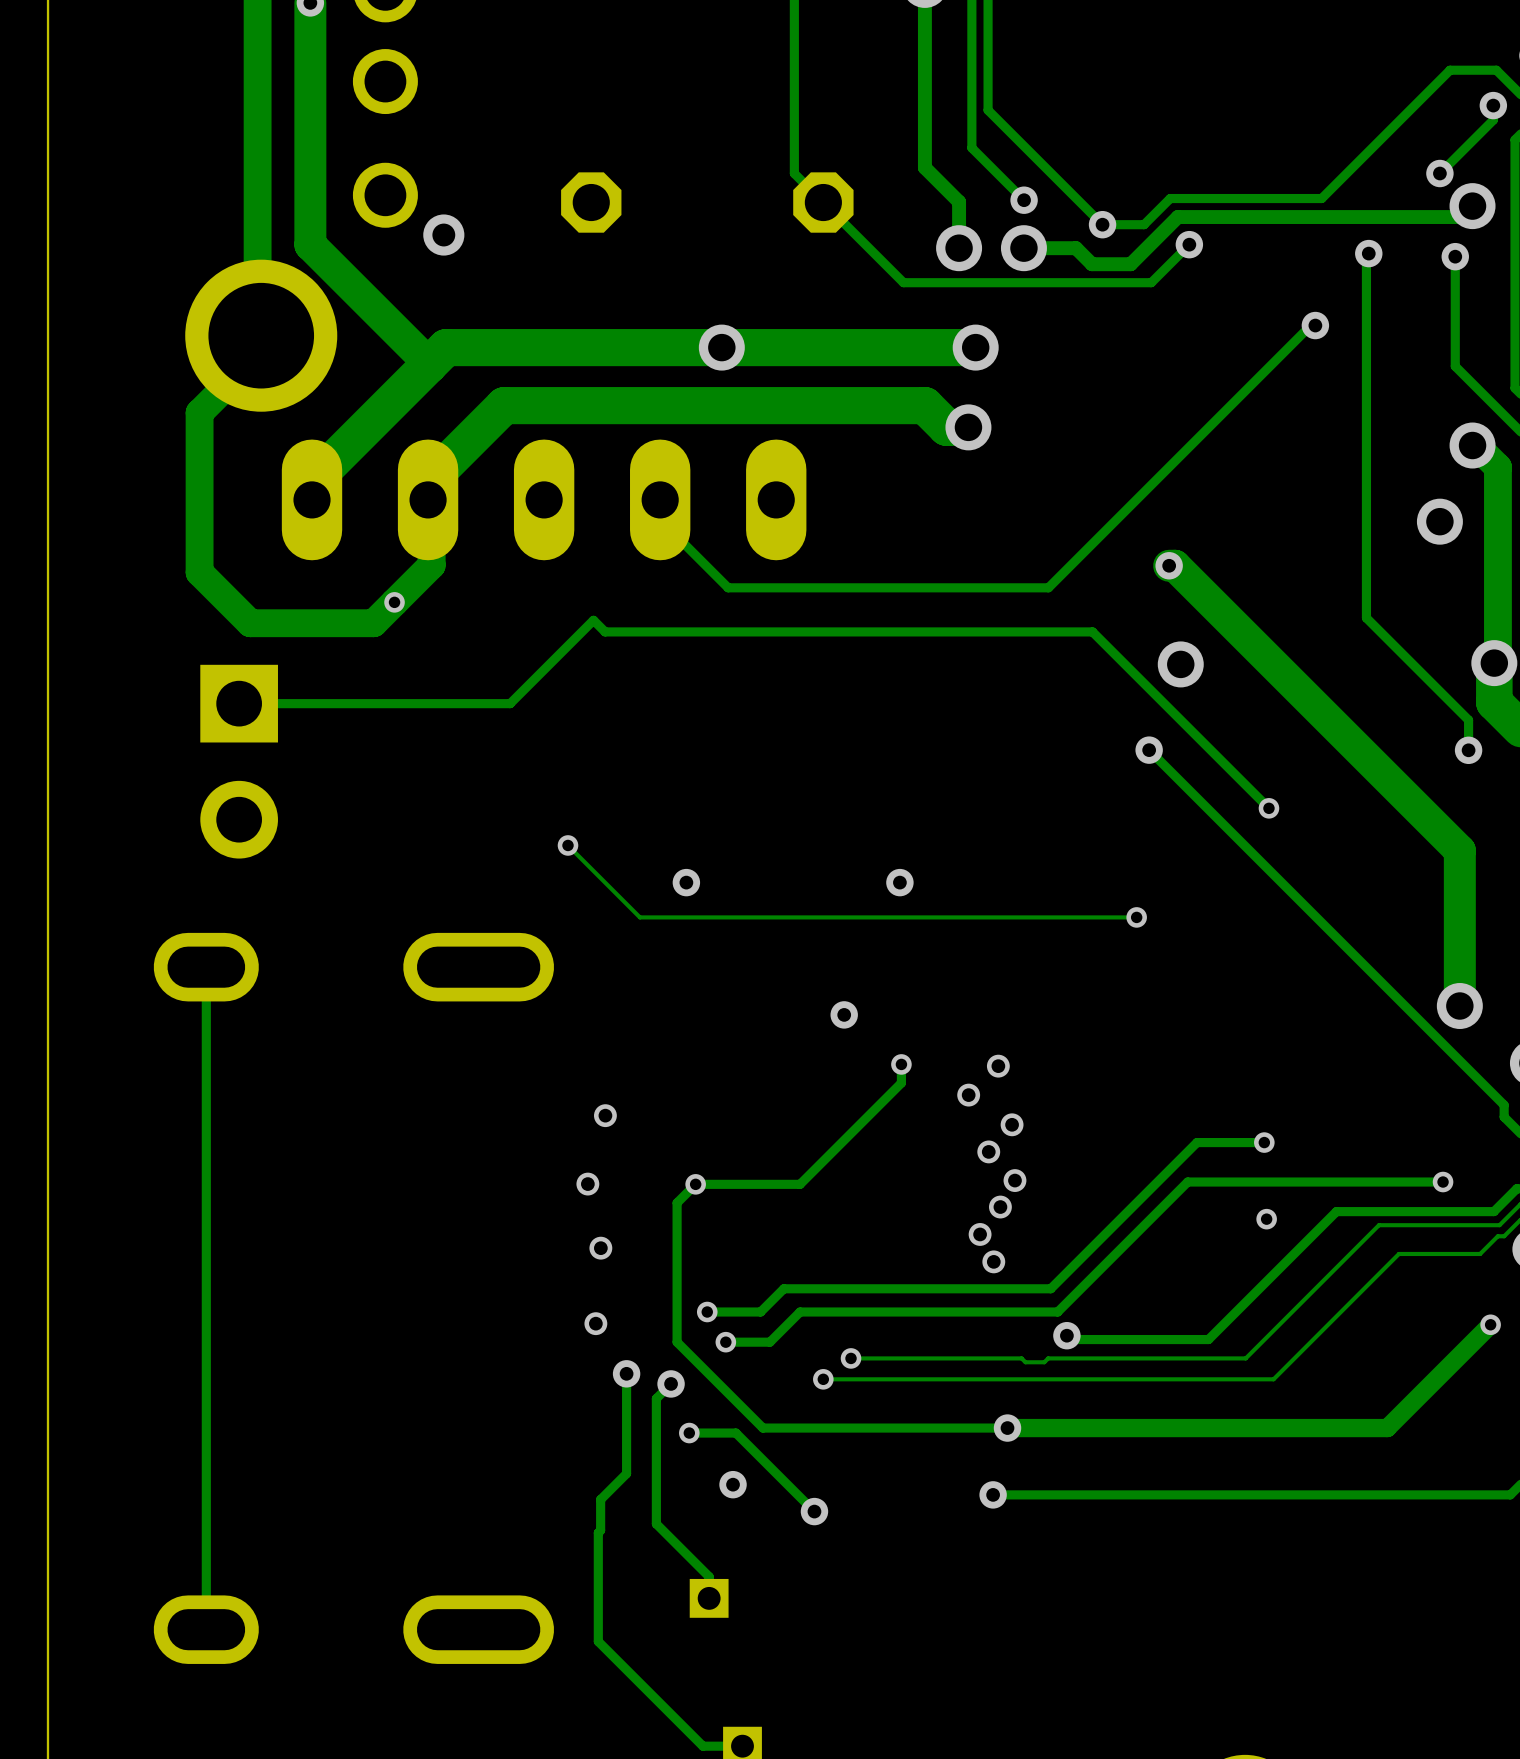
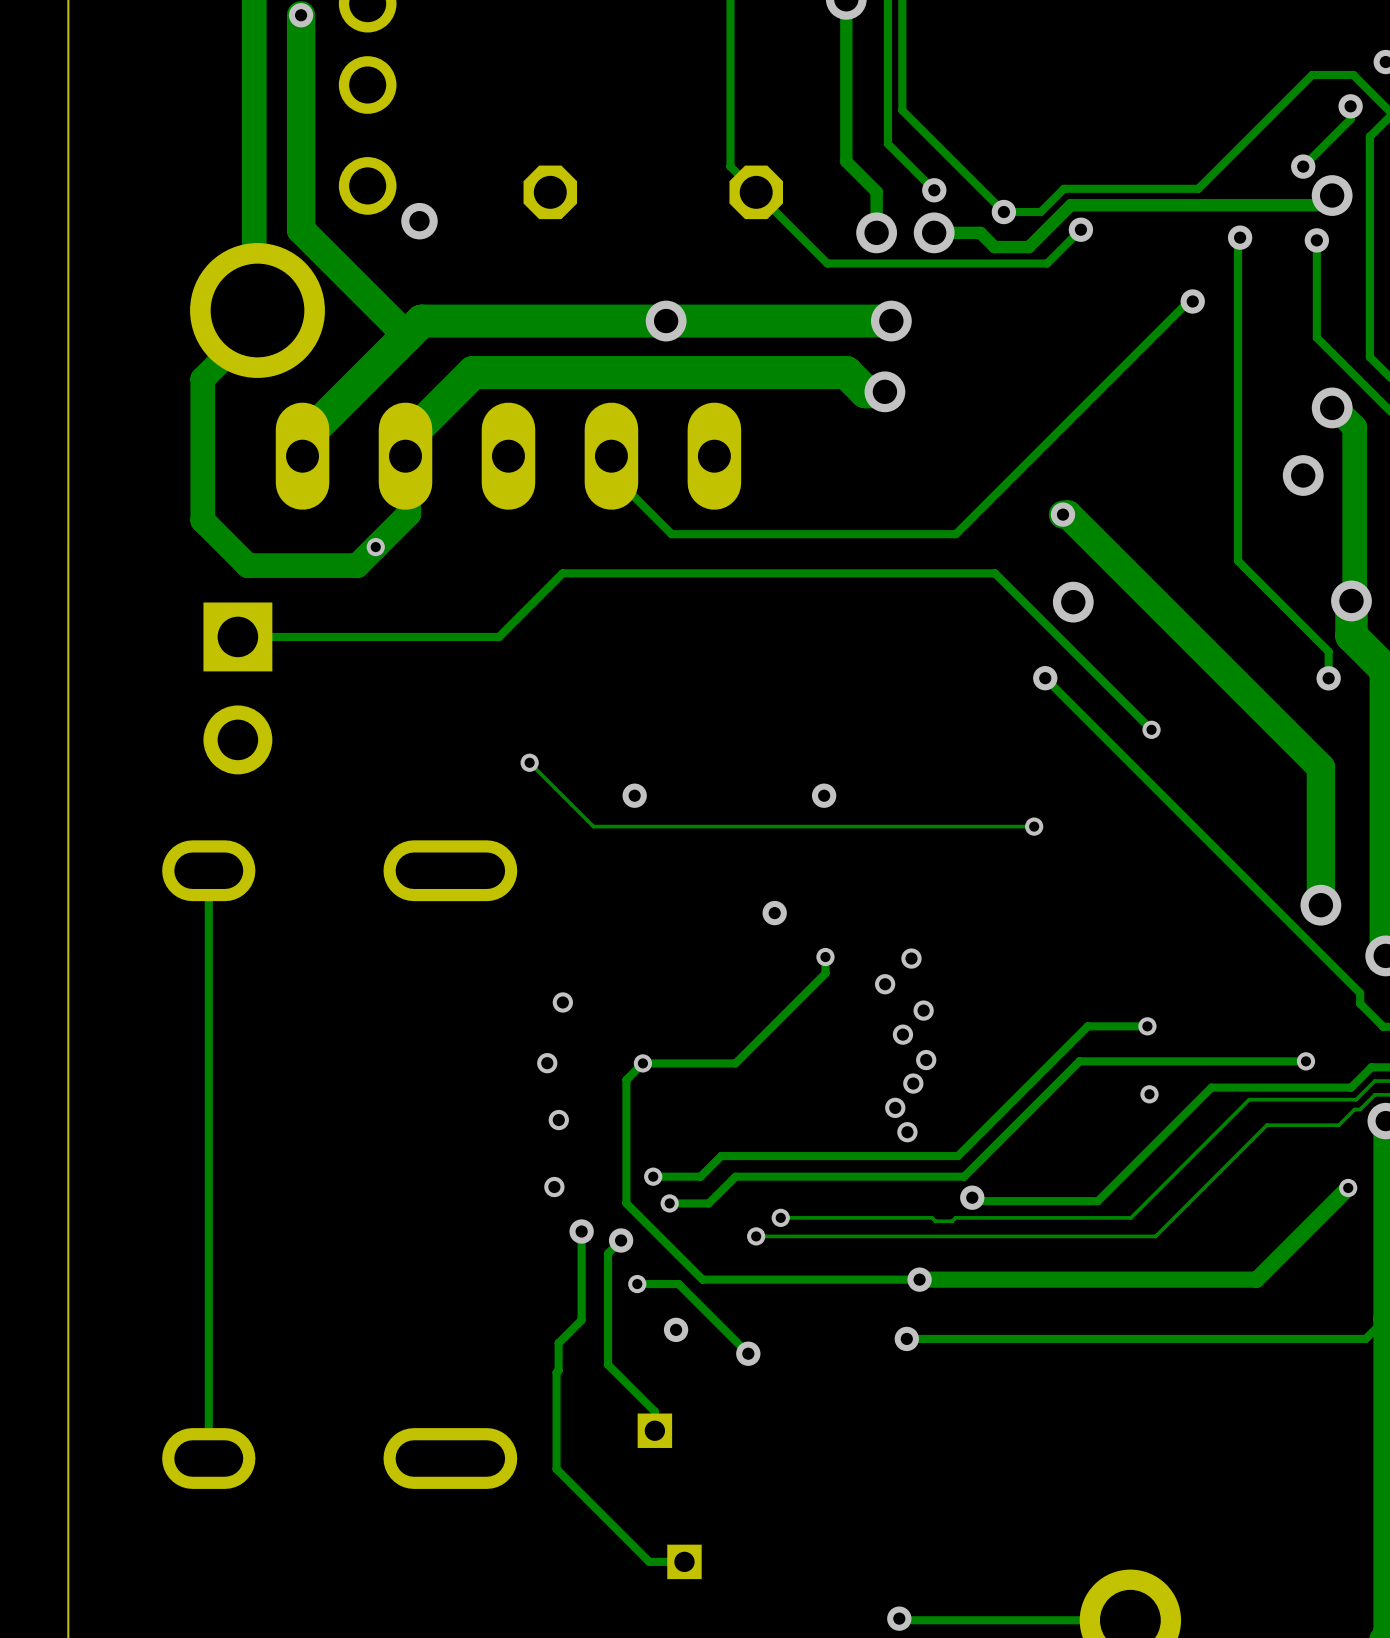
track: (605, 631) (593, 620) (510, 703) -> (562, 573) (498, 636) (478, 636)

